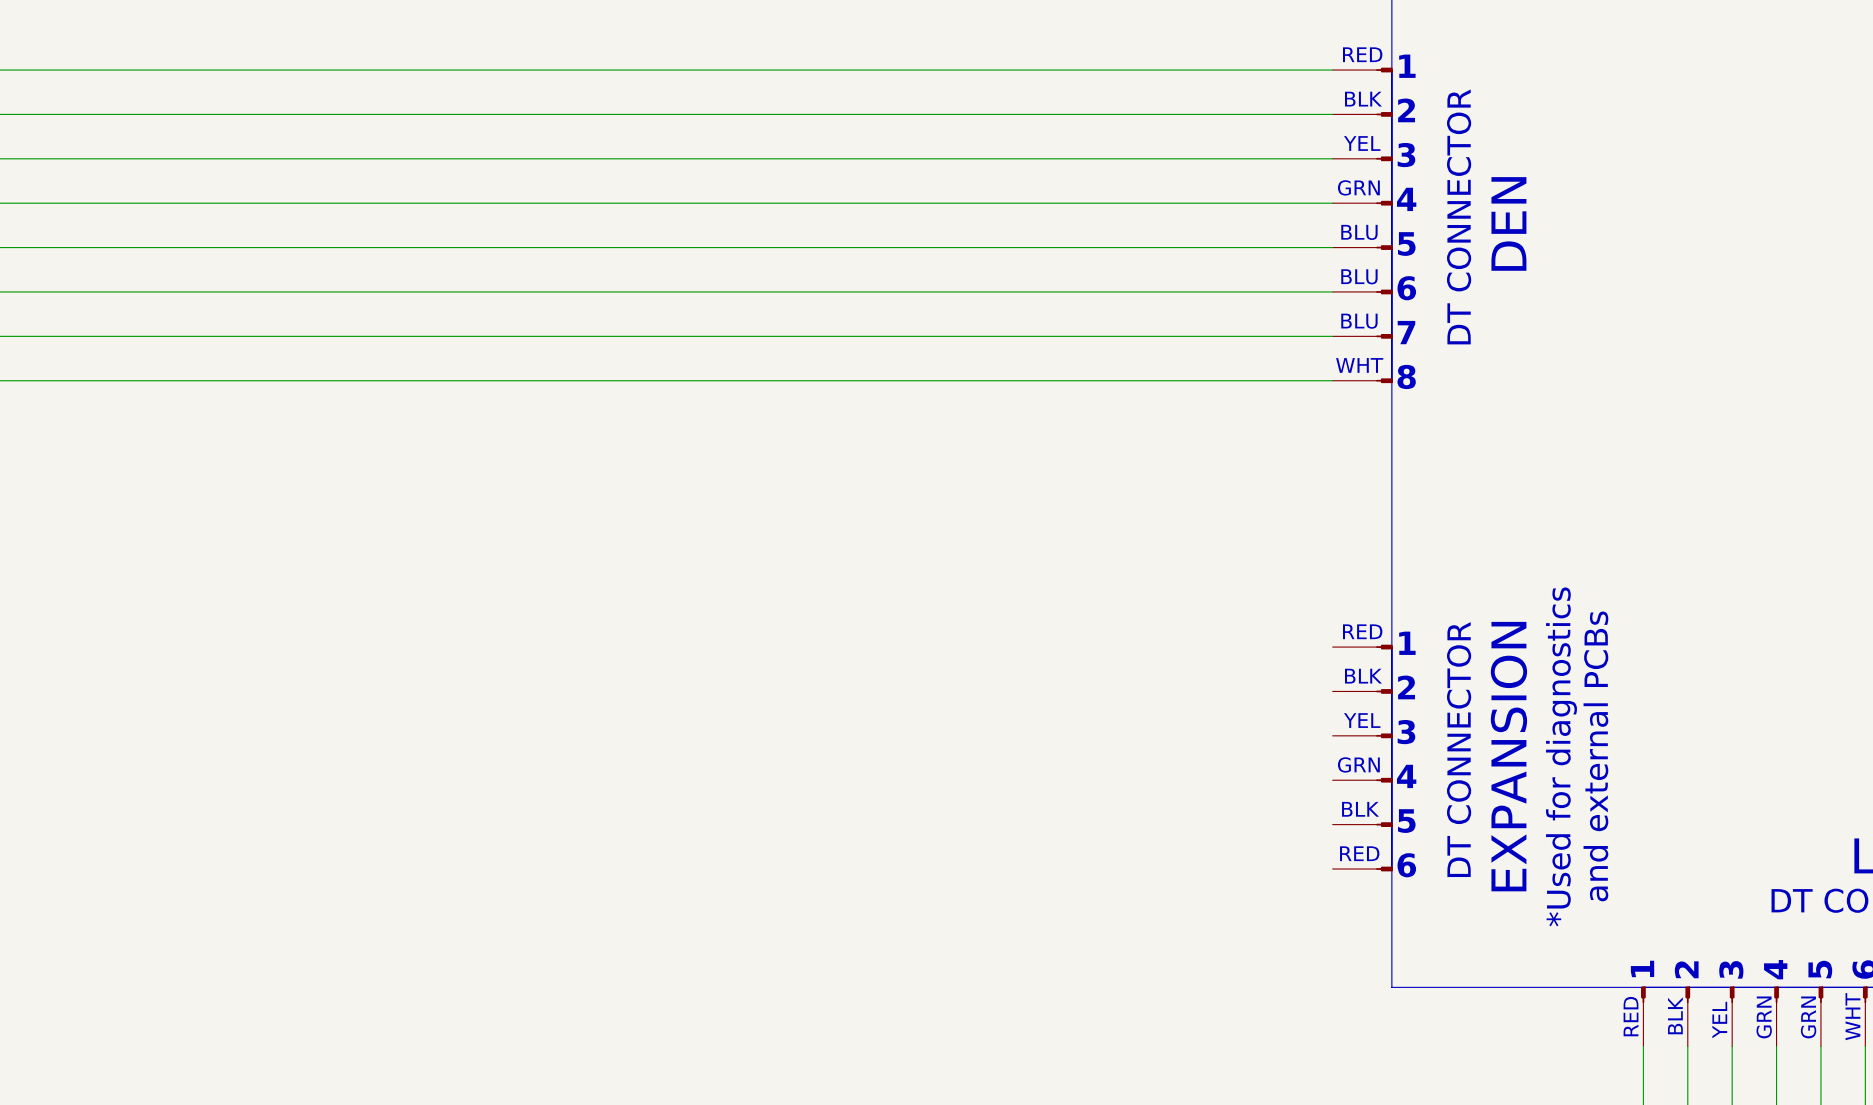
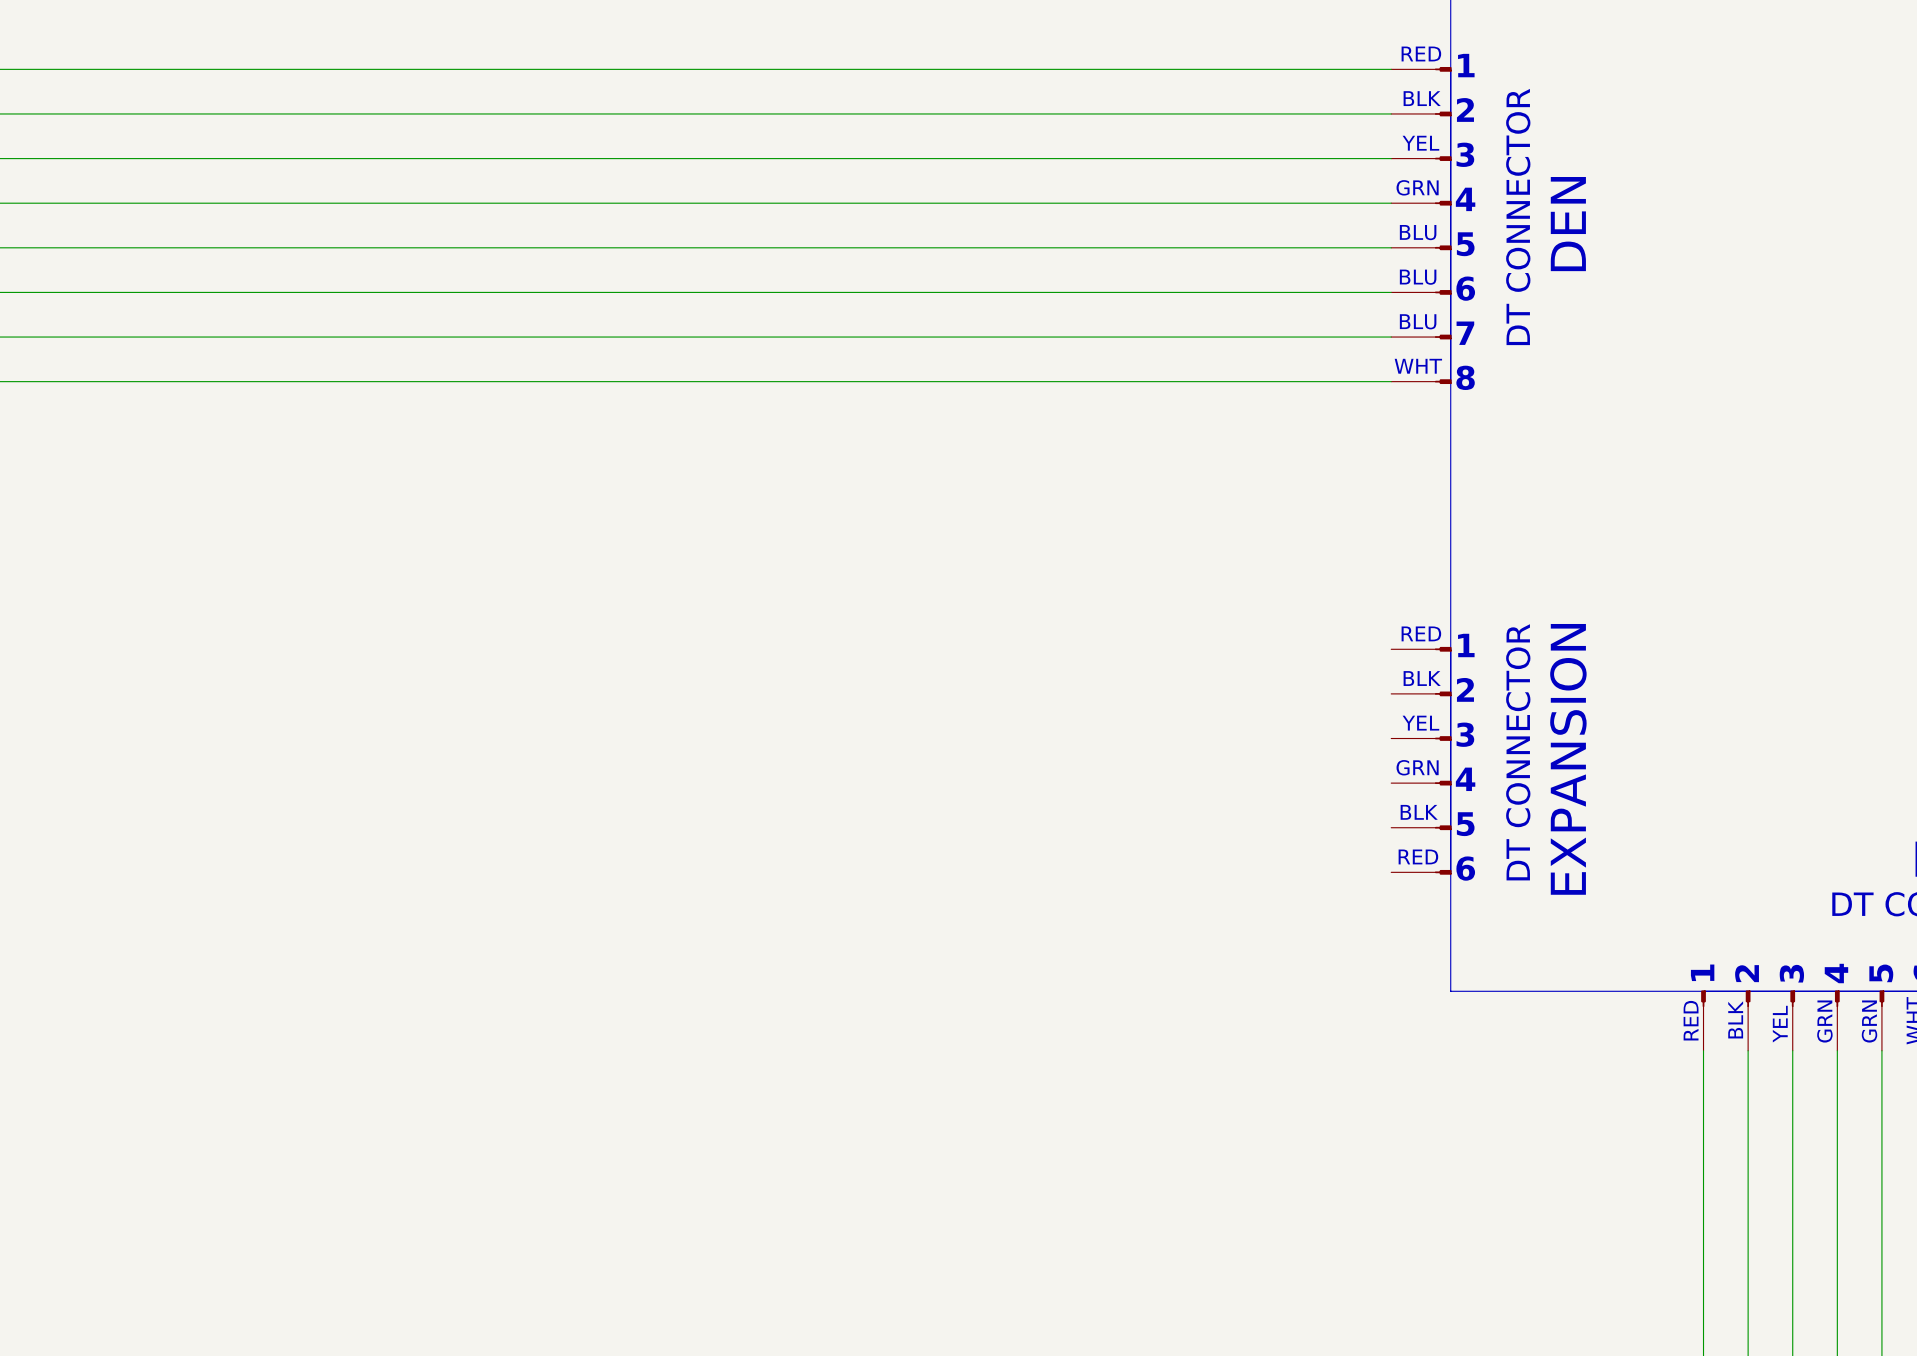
text: *Used for diagnostics (1561, 756) -> none
text: and external PCBs (1595, 756) -> none

